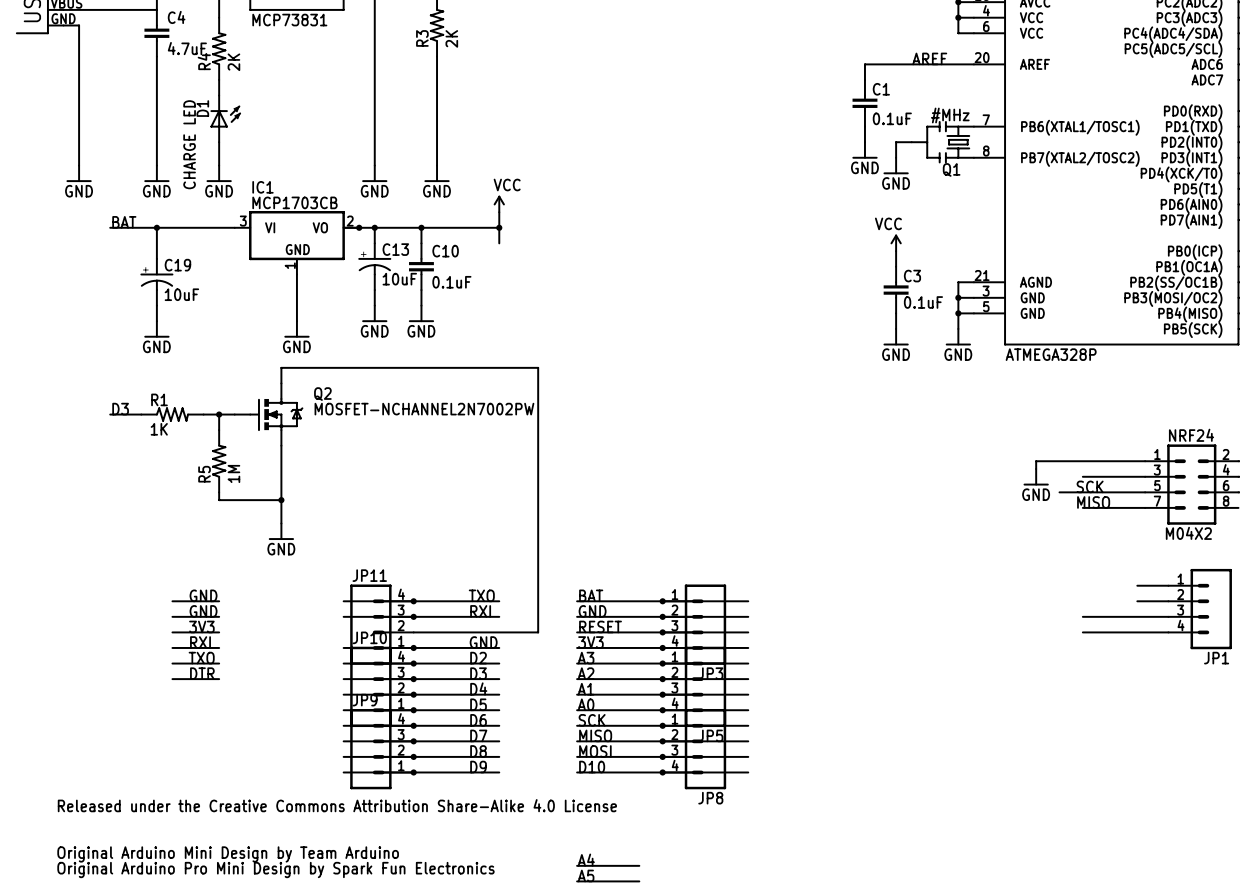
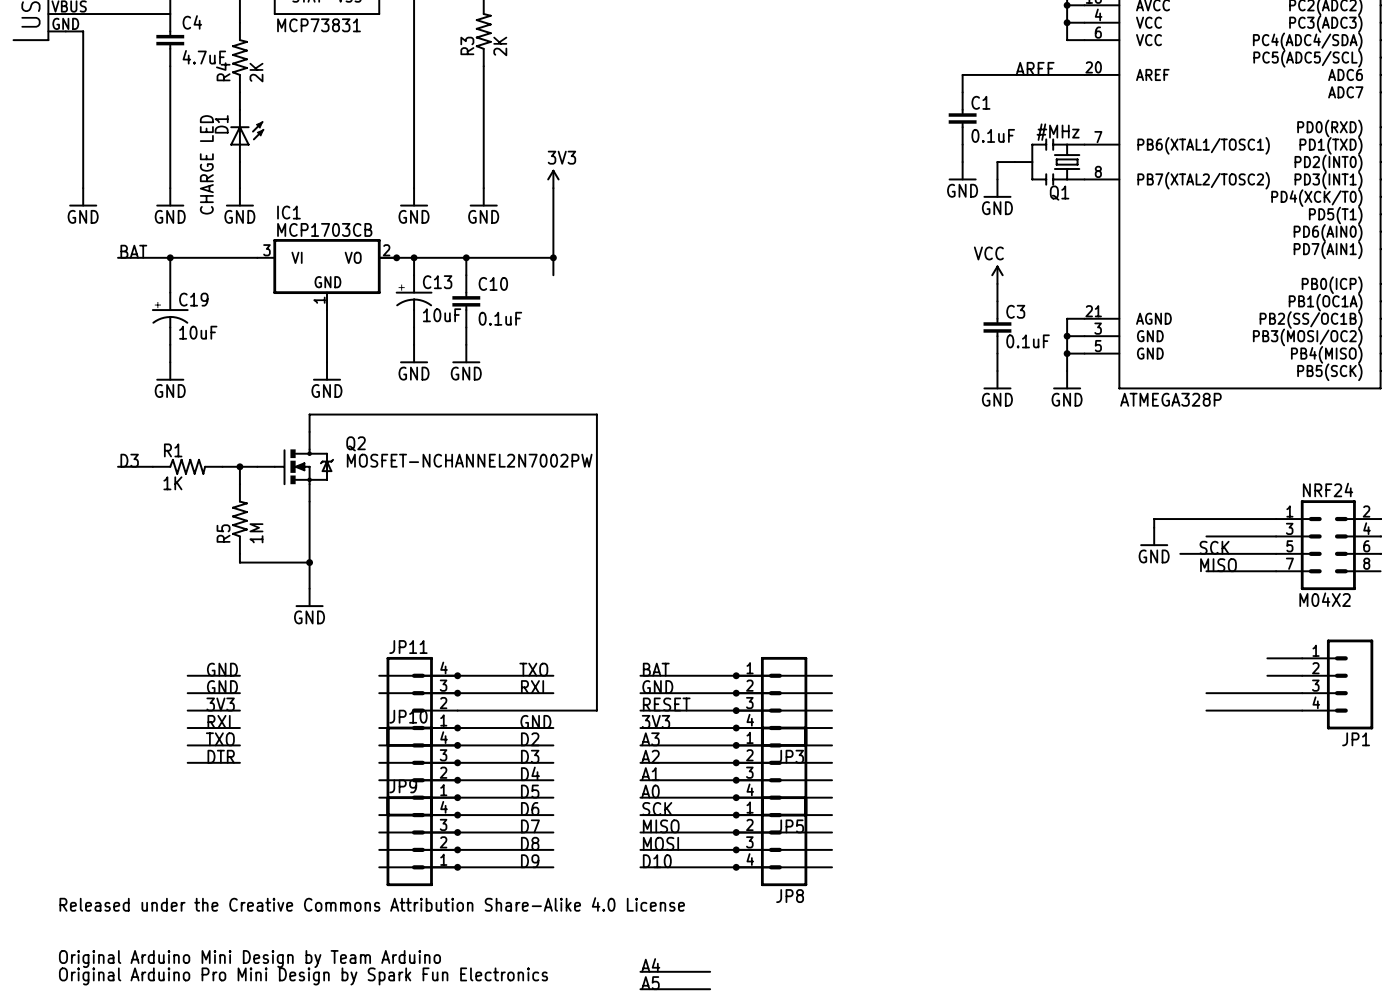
power symbol: none -> 3V3 (553, 179)
wire: none -> (553, 188) (553, 240)
power symbol: VCC (499, 204) -> none

